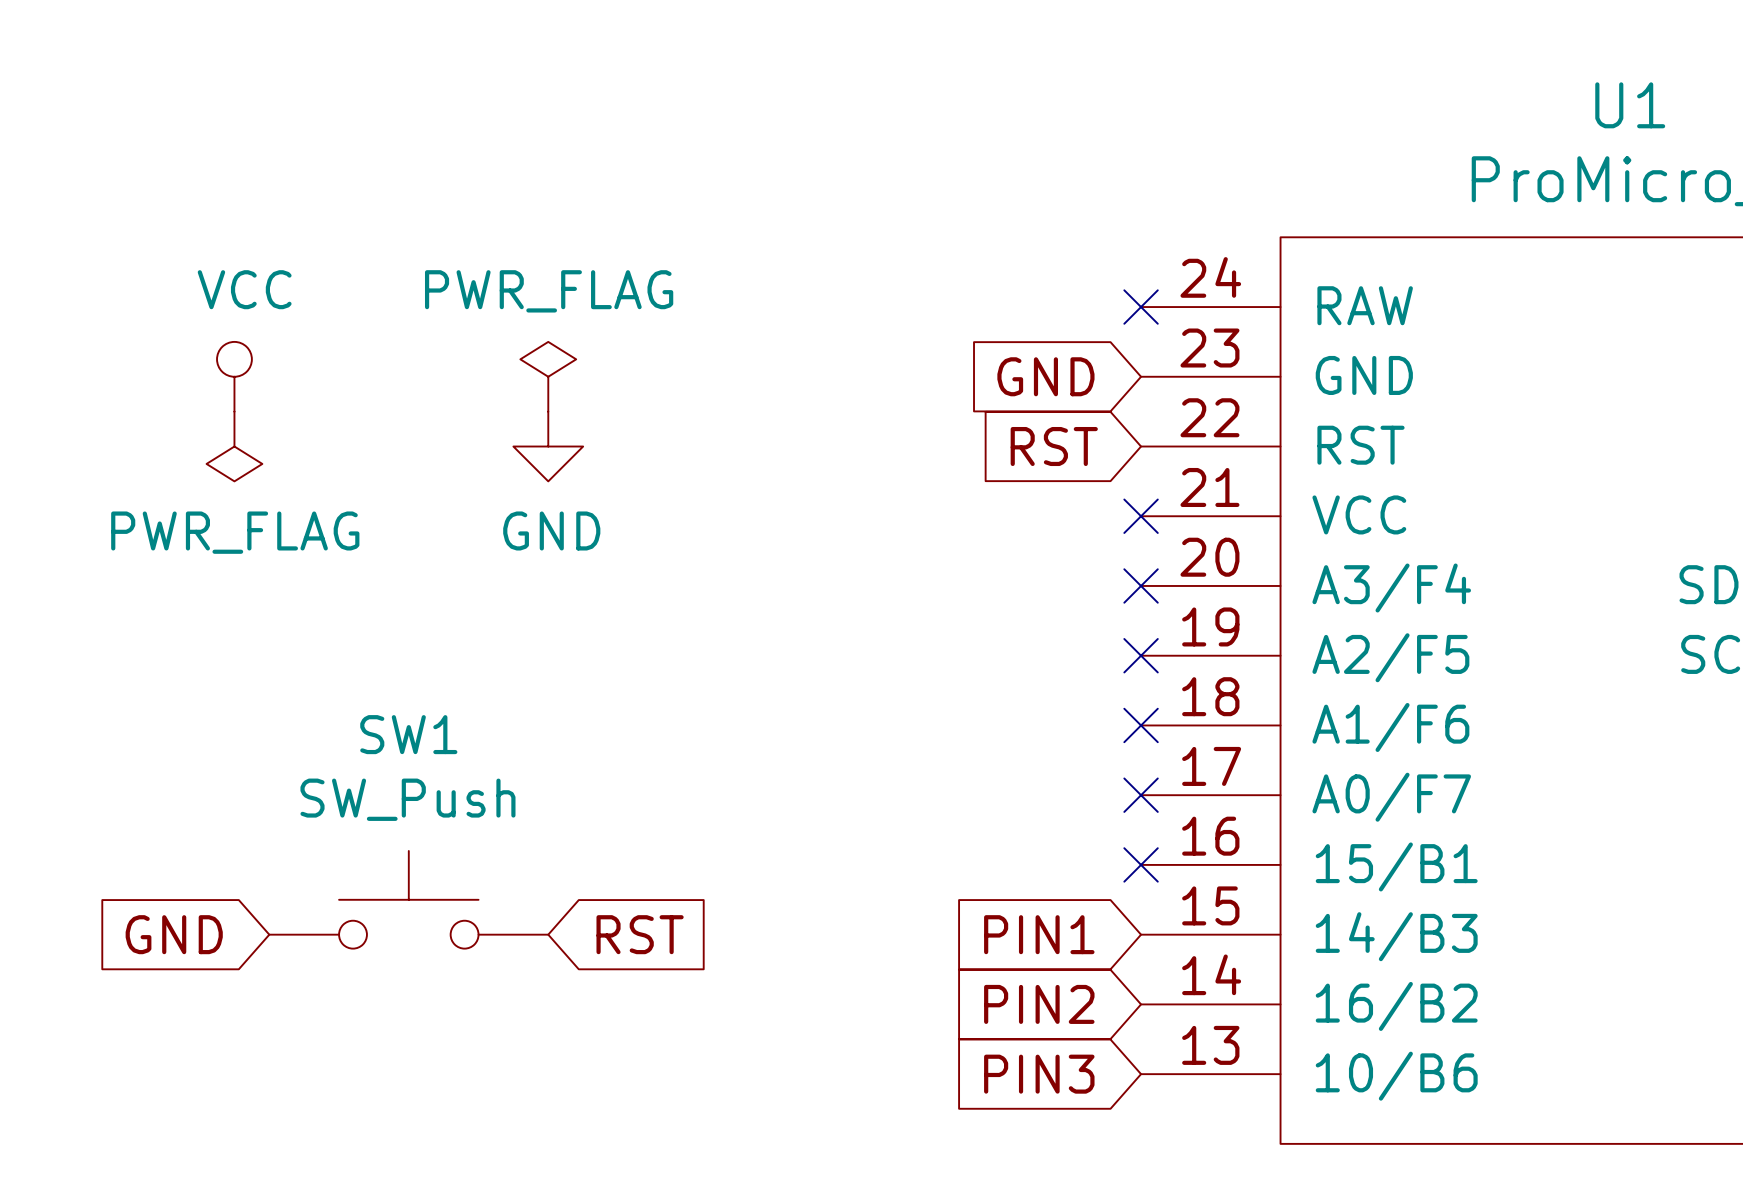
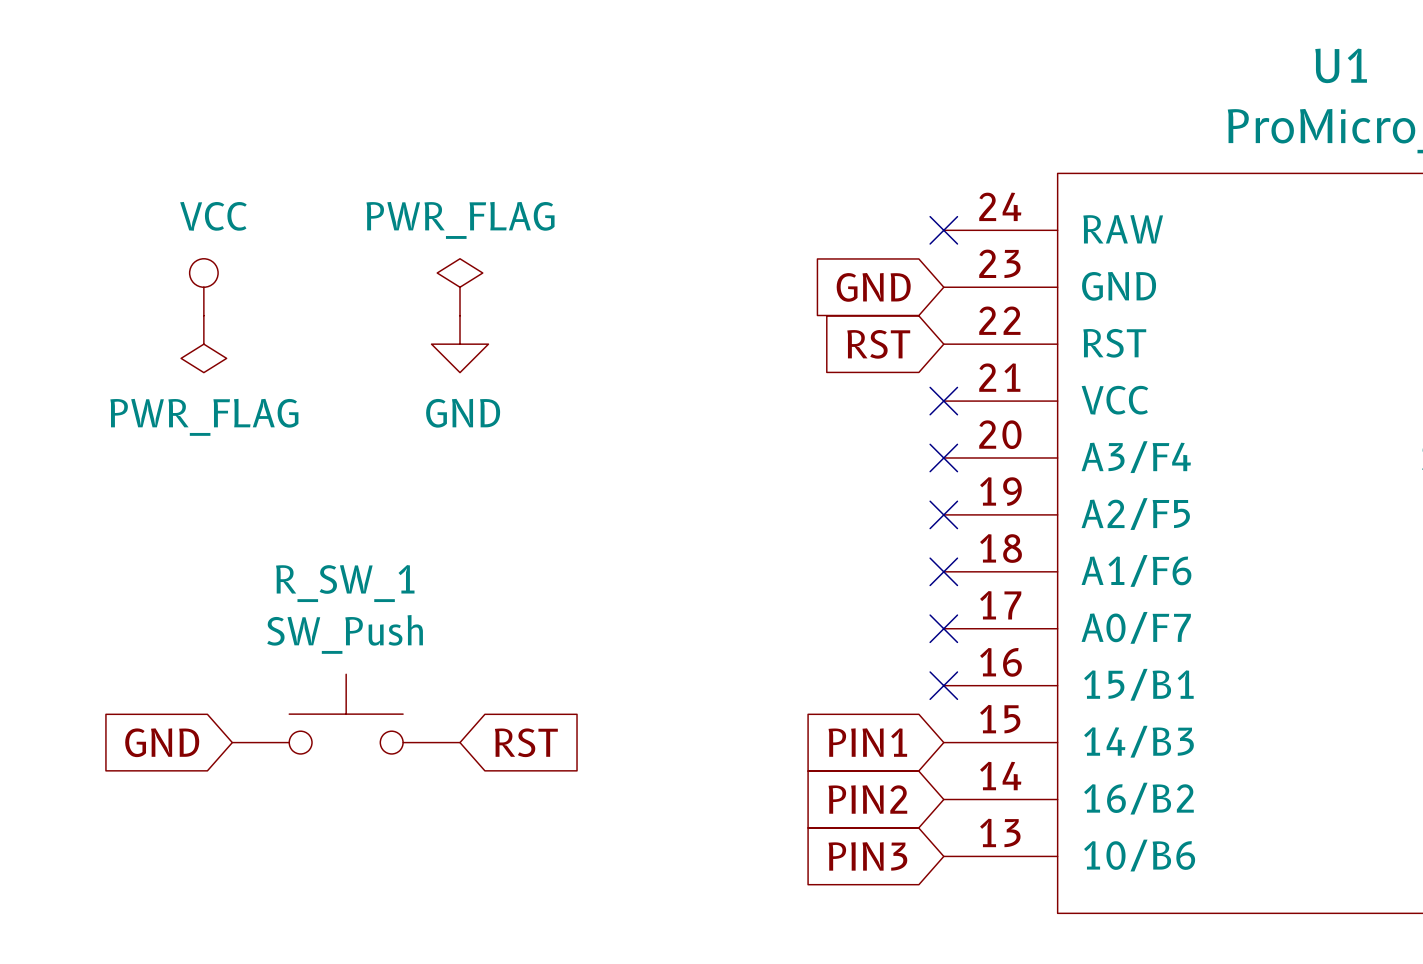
SW1 name: SW1 (408, 734) -> R_SW_1 (345, 583)

